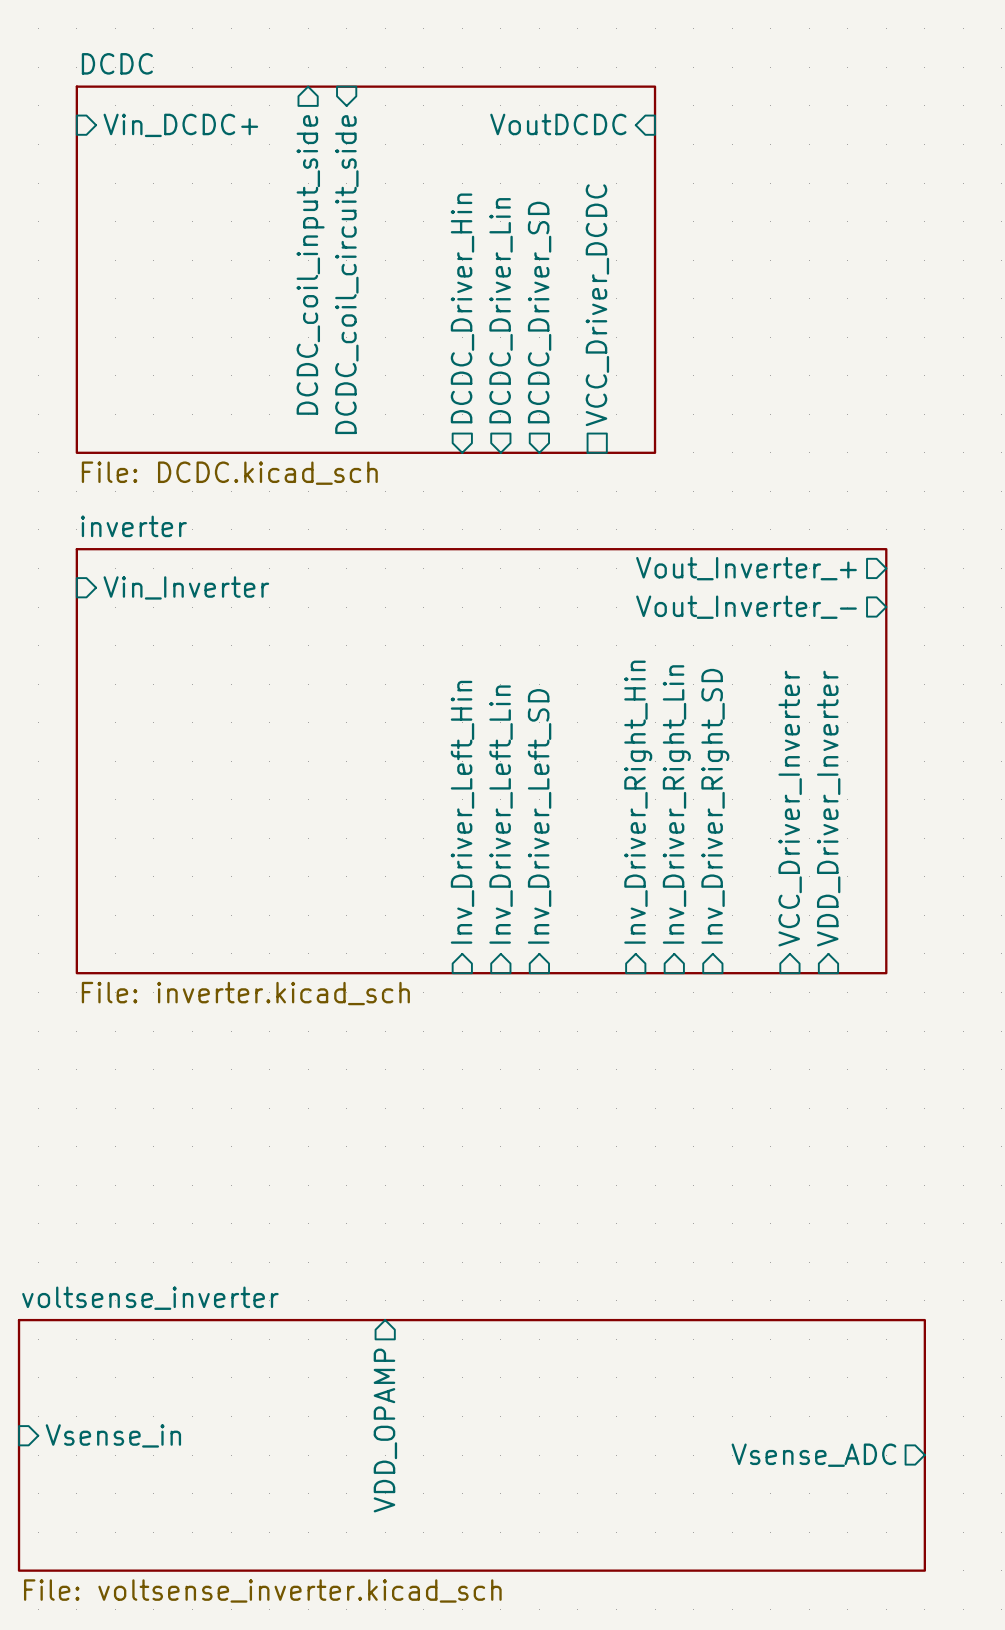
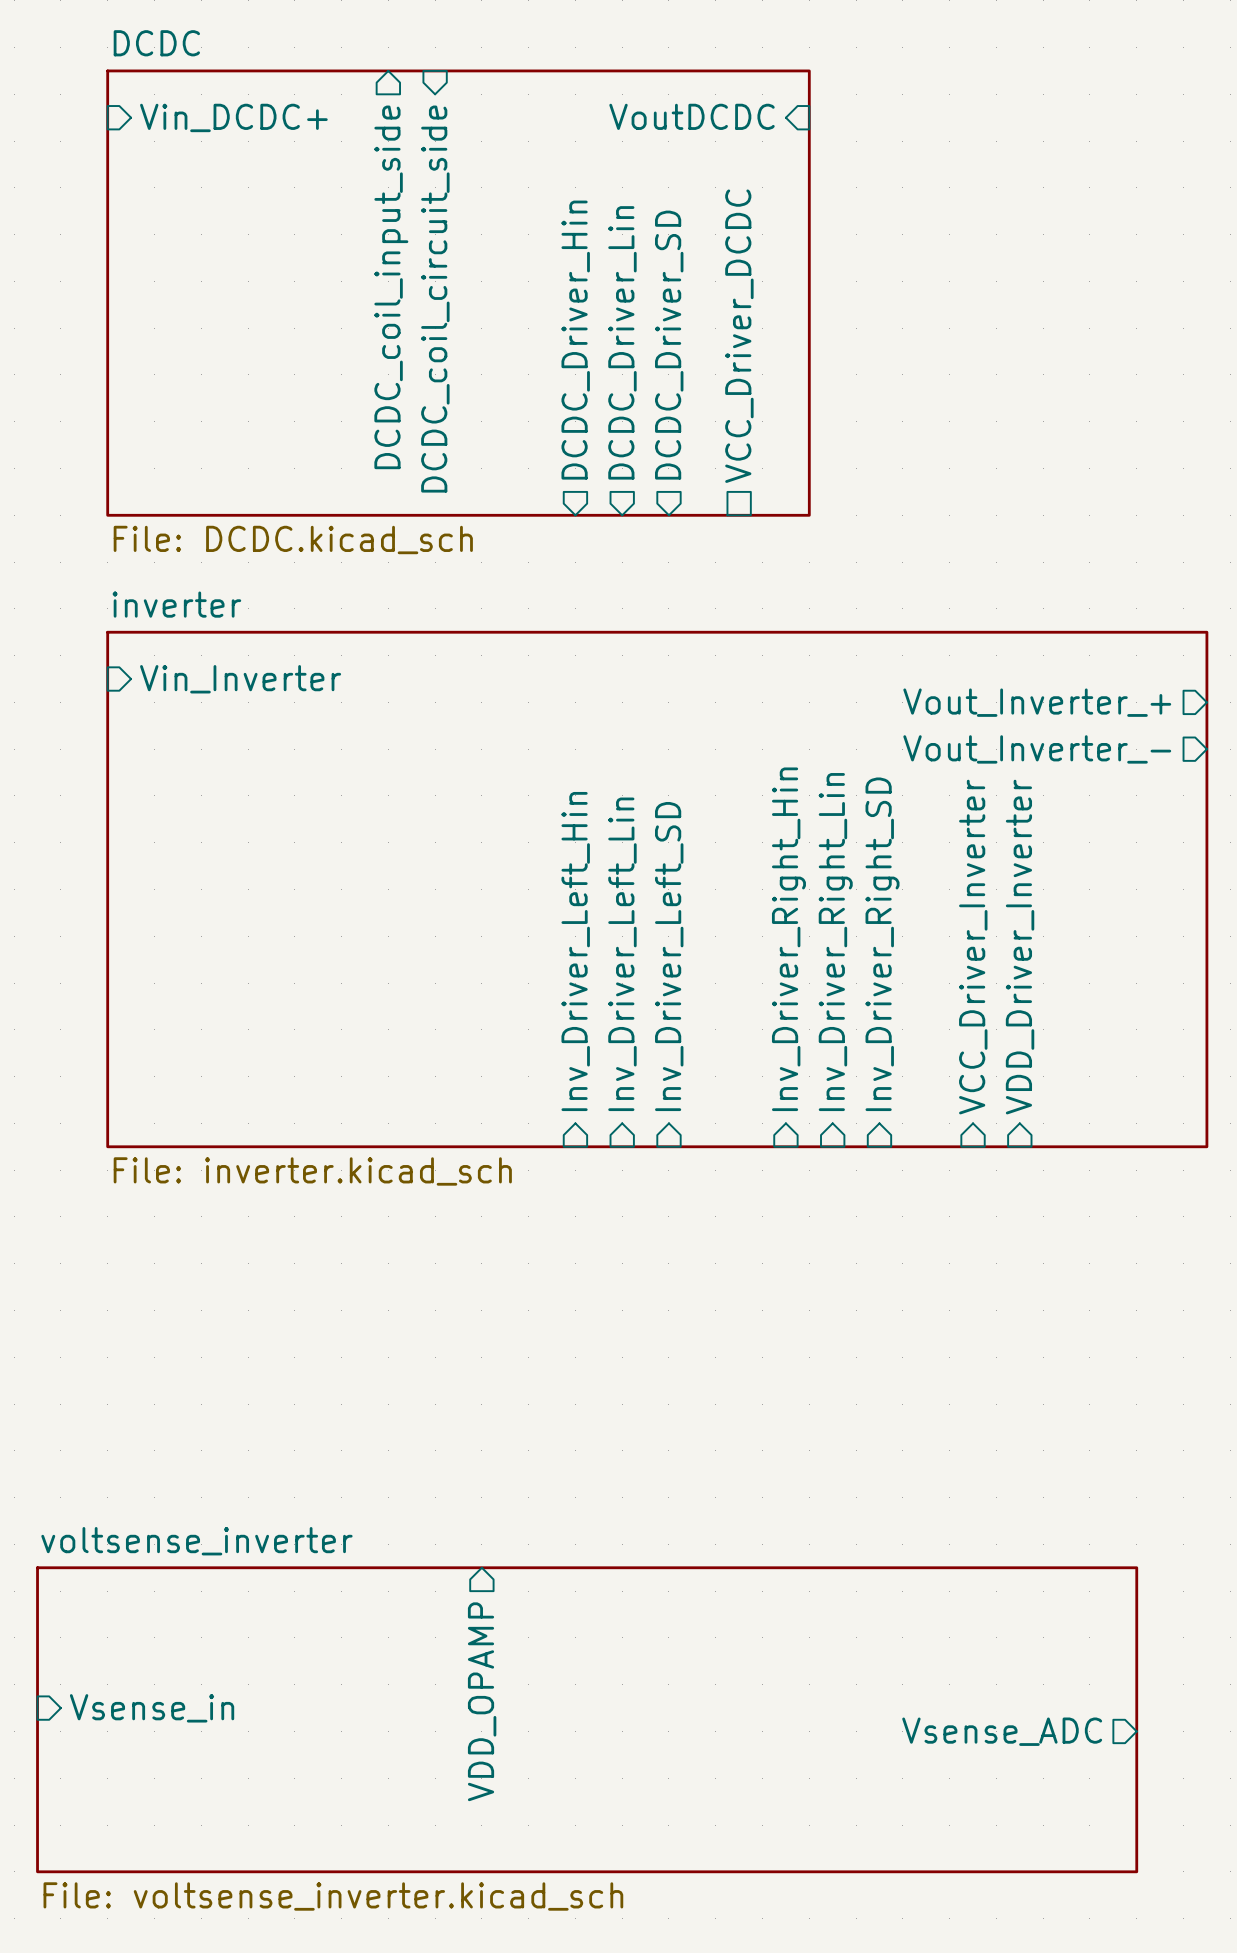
sheet pin position: Vout_Inverter_+ (746, 568) -> Vout_Inverter_+ (1037, 702)
sheet pin position: Vout_Inverter_- (746, 607) -> Vout_Inverter_- (1037, 749)
sheet inverter: File: inverter.kicad_sch (481, 761) -> none
sheet inverter: none -> File: inverter.kicad_sch (657, 889)

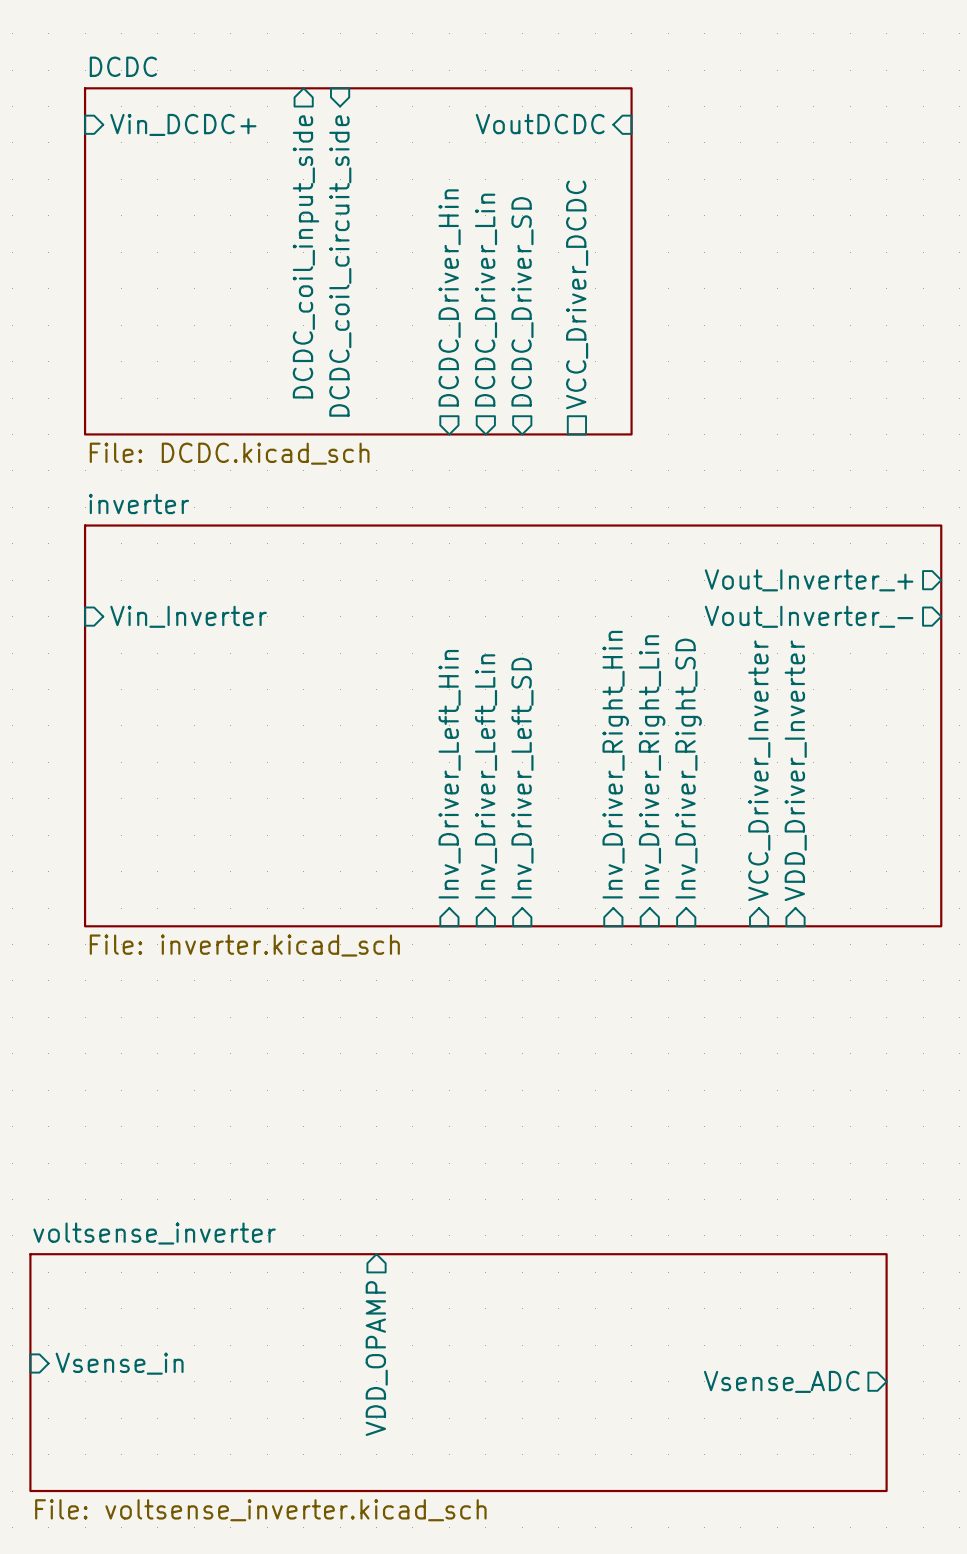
sheet pin position: Vin_Inverter (240, 679) -> Vin_Inverter (188, 616)

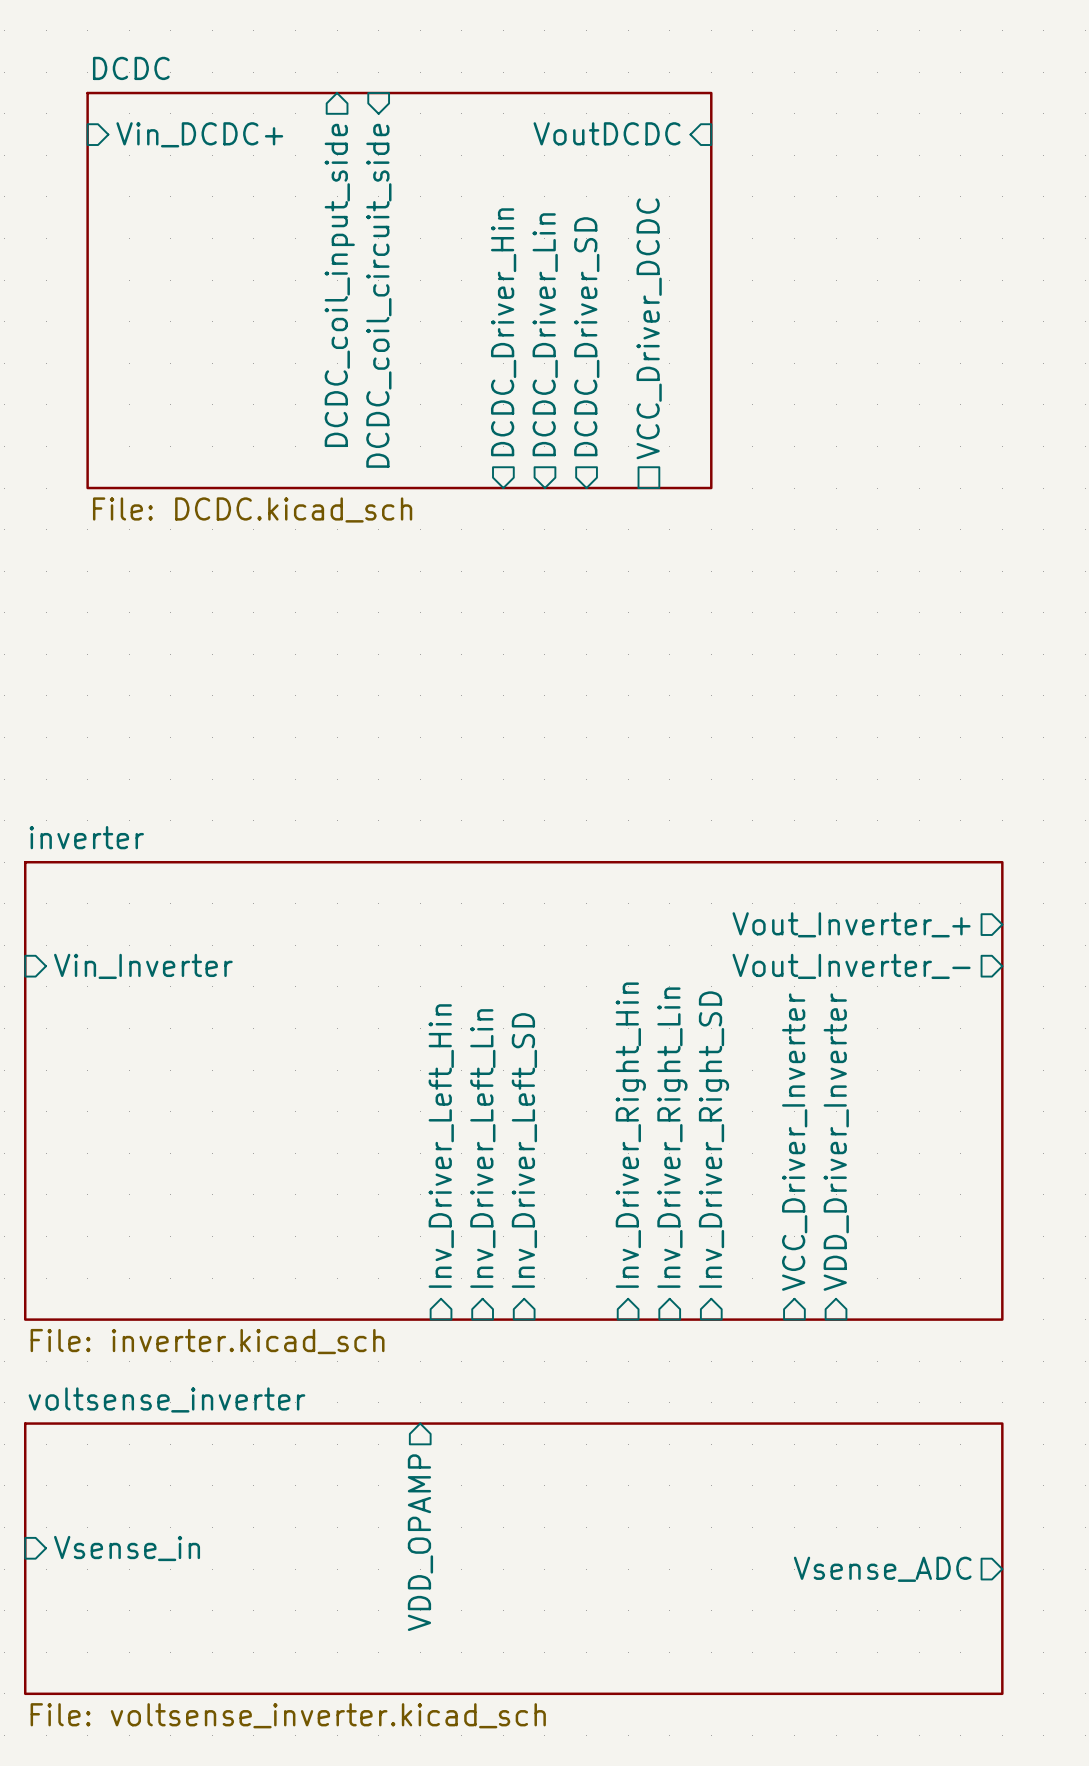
sheet pin position: Vout_Inverter_+ (809, 580) -> Vout_Inverter_+ (851, 924)
sheet pin position: Vin_Inverter (188, 616) -> Vin_Inverter (143, 966)
sheet pin position: Vout_Inverter_- (809, 616) -> Vout_Inverter_- (851, 966)
sheet inverter position: (513, 725) -> (513, 1090)
sheet pin position: Inv_Driver_Right_Hin (615, 764) -> Inv_Driver_Right_Hin (630, 1135)
sheet pin position: Inv_Driver_Right_Lin (652, 766) -> Inv_Driver_Right_Lin (672, 1137)
sheet pin position: Inv_Driver_Right_SD (688, 768) -> Inv_Driver_Right_SD (713, 1139)
sheet pin position: VCC_Driver_Inverter (759, 770) -> VCC_Driver_Inverter (794, 1142)
sheet pin position: VDD_Driver_Inverter (795, 770) -> VDD_Driver_Inverter (836, 1142)
sheet pin position: Inv_Driver_Left_Hin (449, 774) -> Inv_Driver_Left_Hin (441, 1146)
sheet pin position: Inv_Driver_Left_Lin (486, 776) -> Inv_Driver_Left_Lin (482, 1148)
sheet pin position: Inv_Driver_Left_SD (522, 778) -> Inv_Driver_Left_SD (524, 1150)

